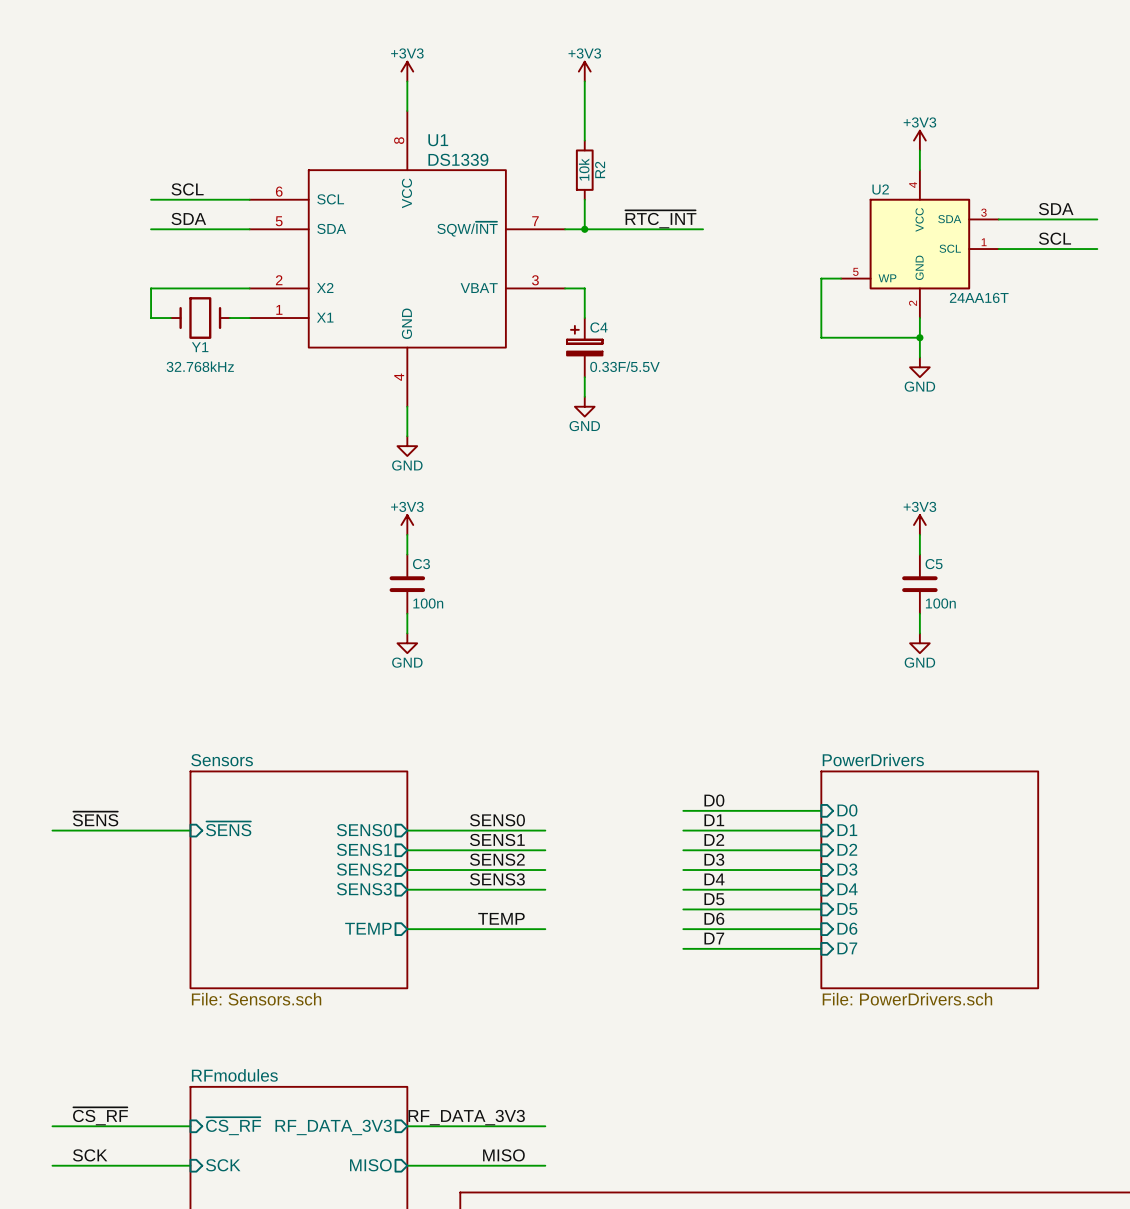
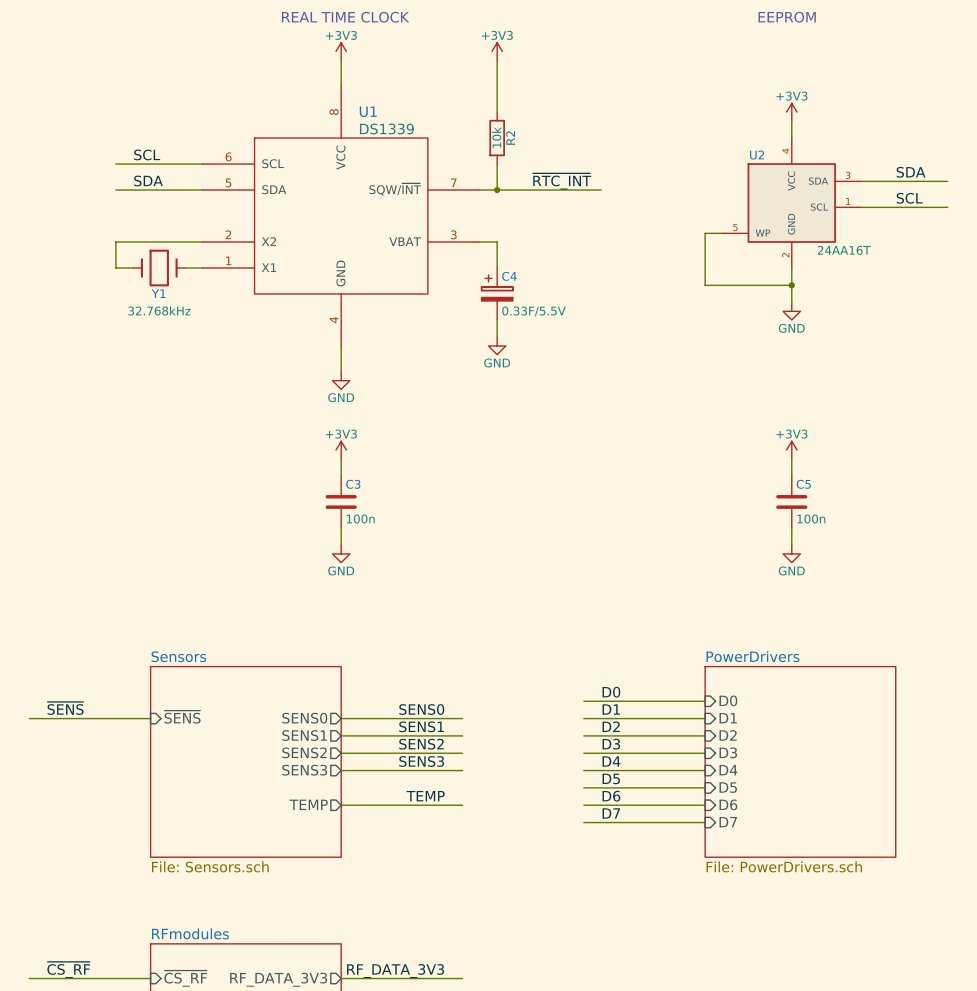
text: none -> REAL TIME CLOCK (345, 17)
text: none -> EEPROM (787, 17)

